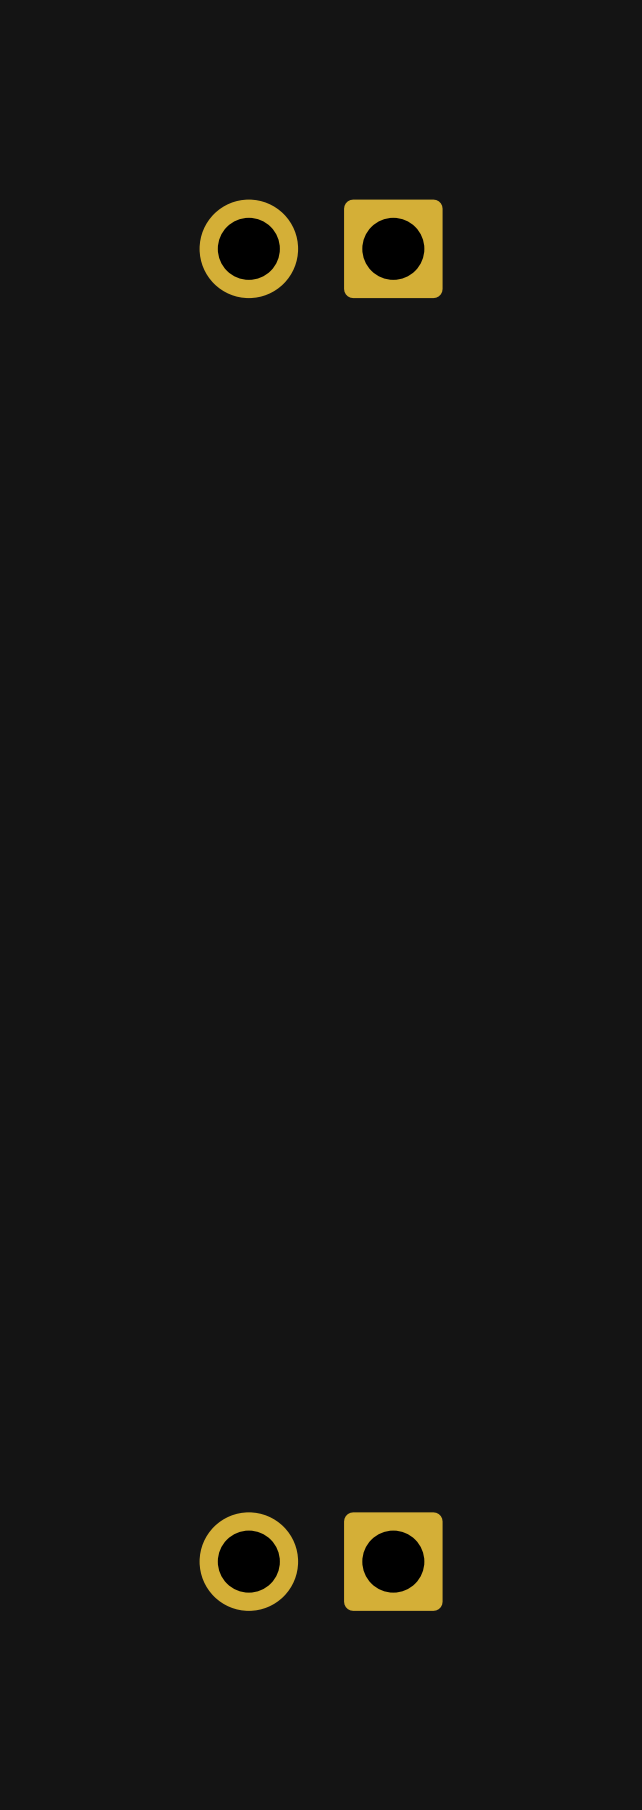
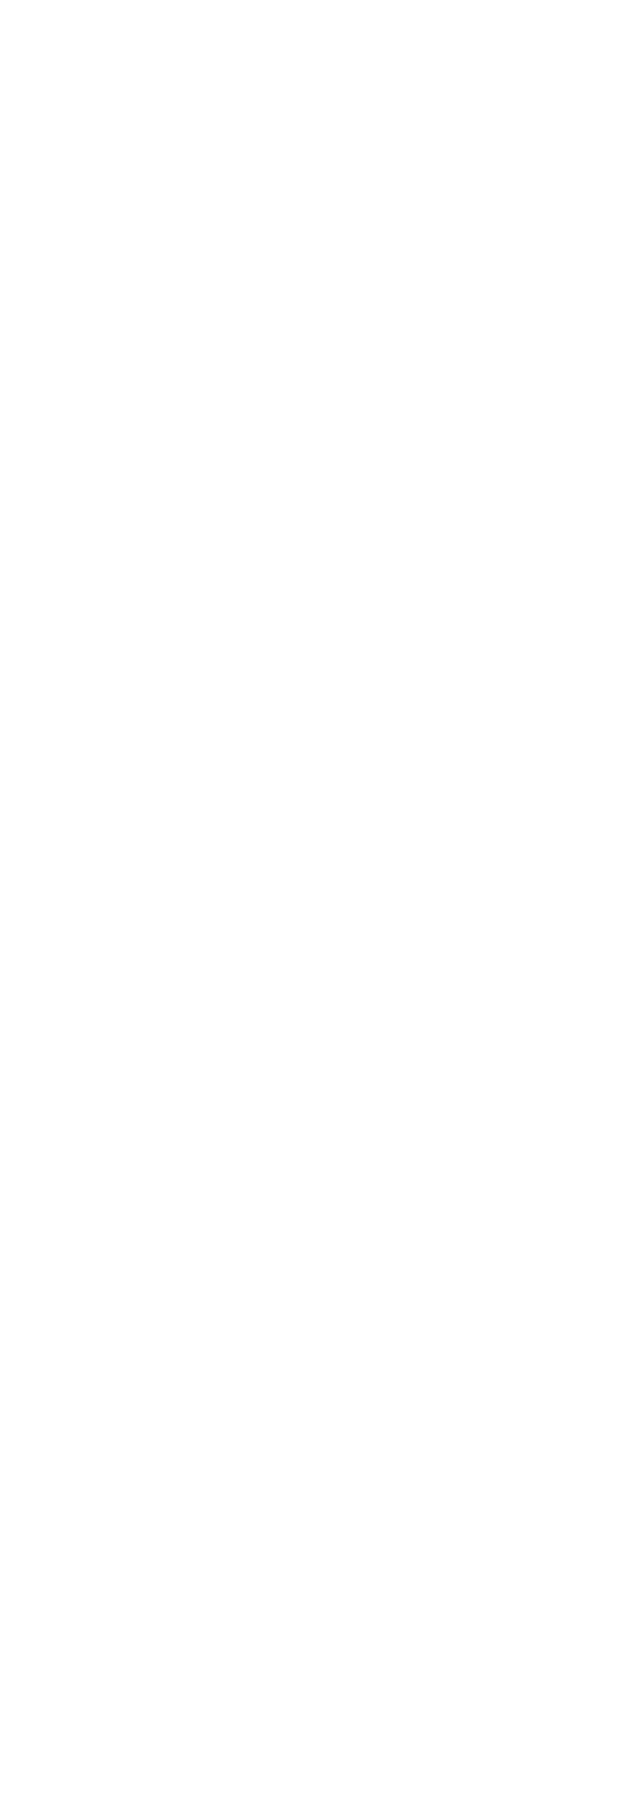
part: (321, 248) -> none
part: (321, 1561) -> none

